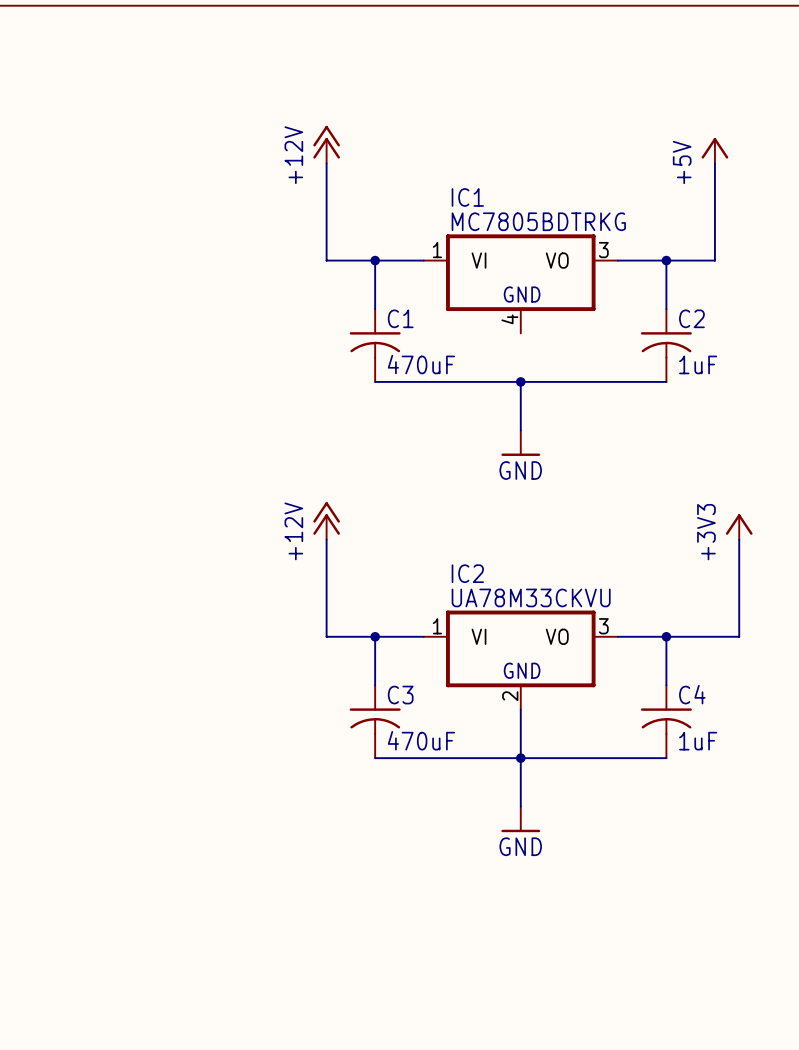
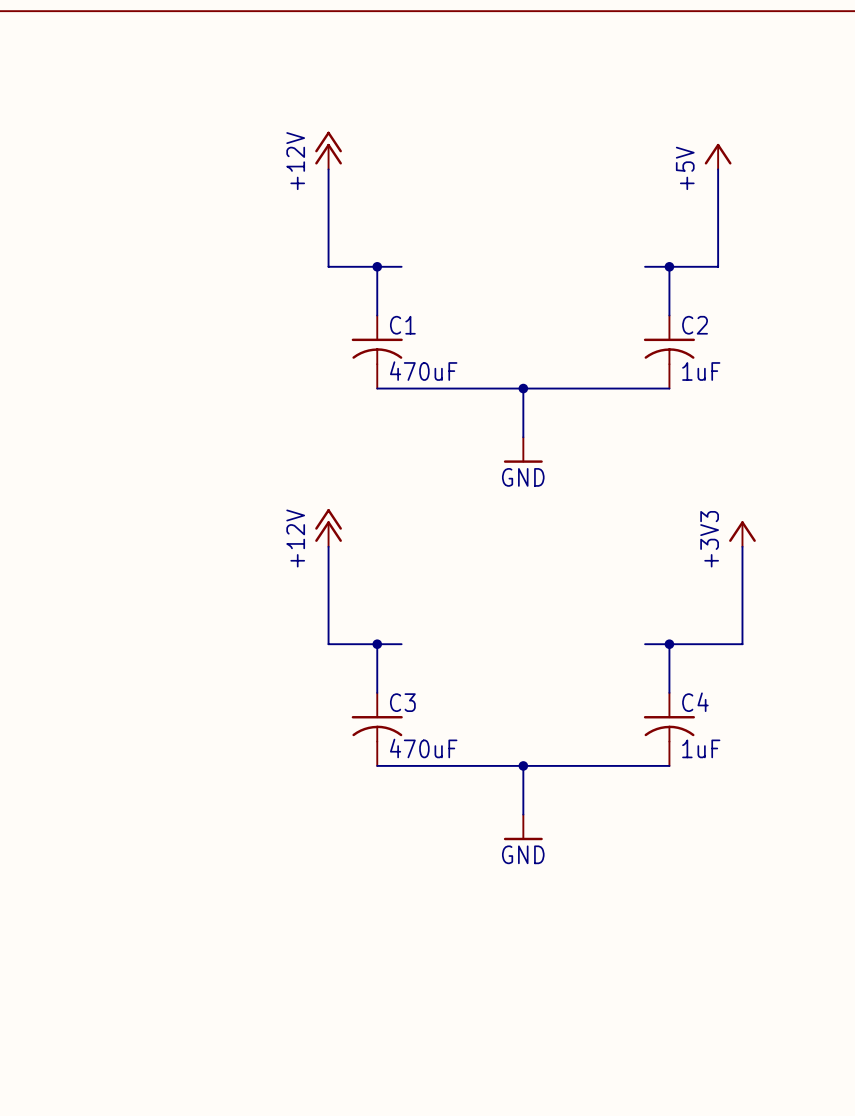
wire: (399, 260) (423, 260) -> none
wire: (617, 260) (642, 260) -> none
IC1: MC7805BDTRKG (520, 283) -> none
wire: (399, 636) (423, 636) -> none
wire: (617, 636) (642, 636) -> none
IC2: UA78M33CKVU (520, 660) -> none
wire: (520, 709) (520, 758) -> none

